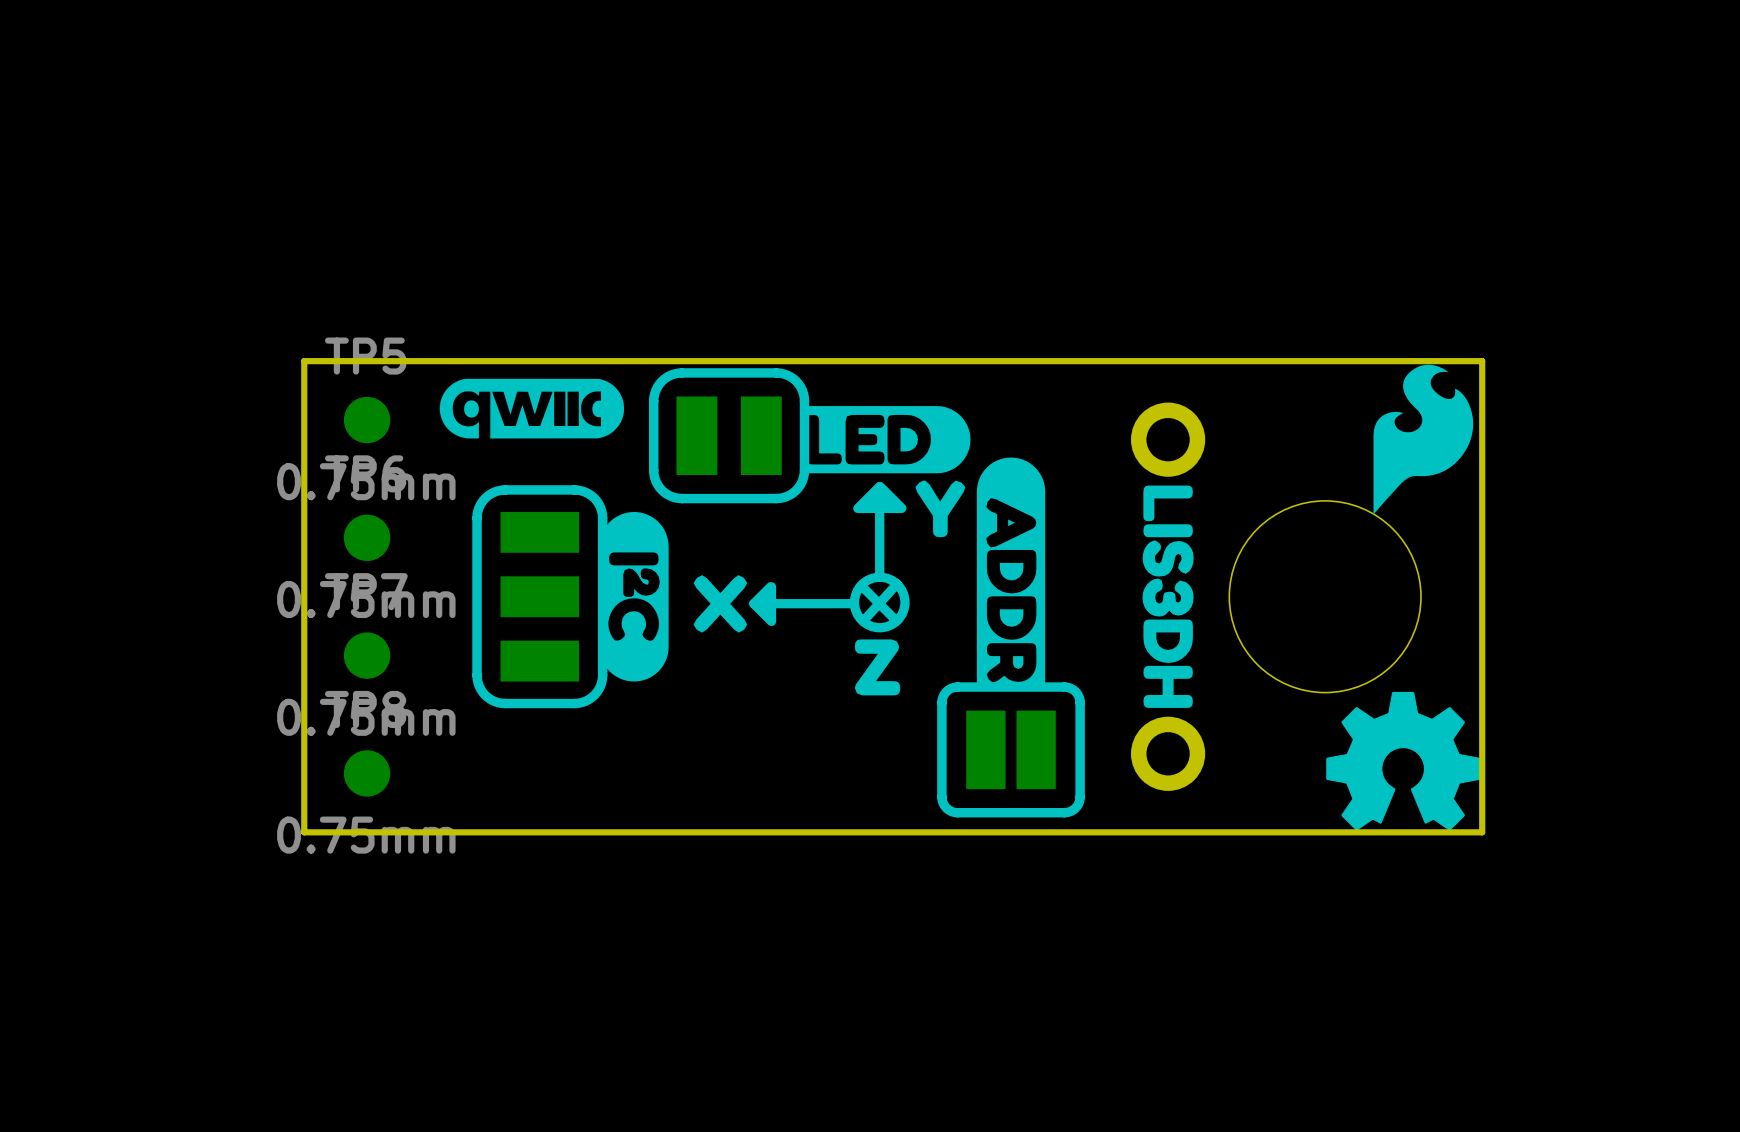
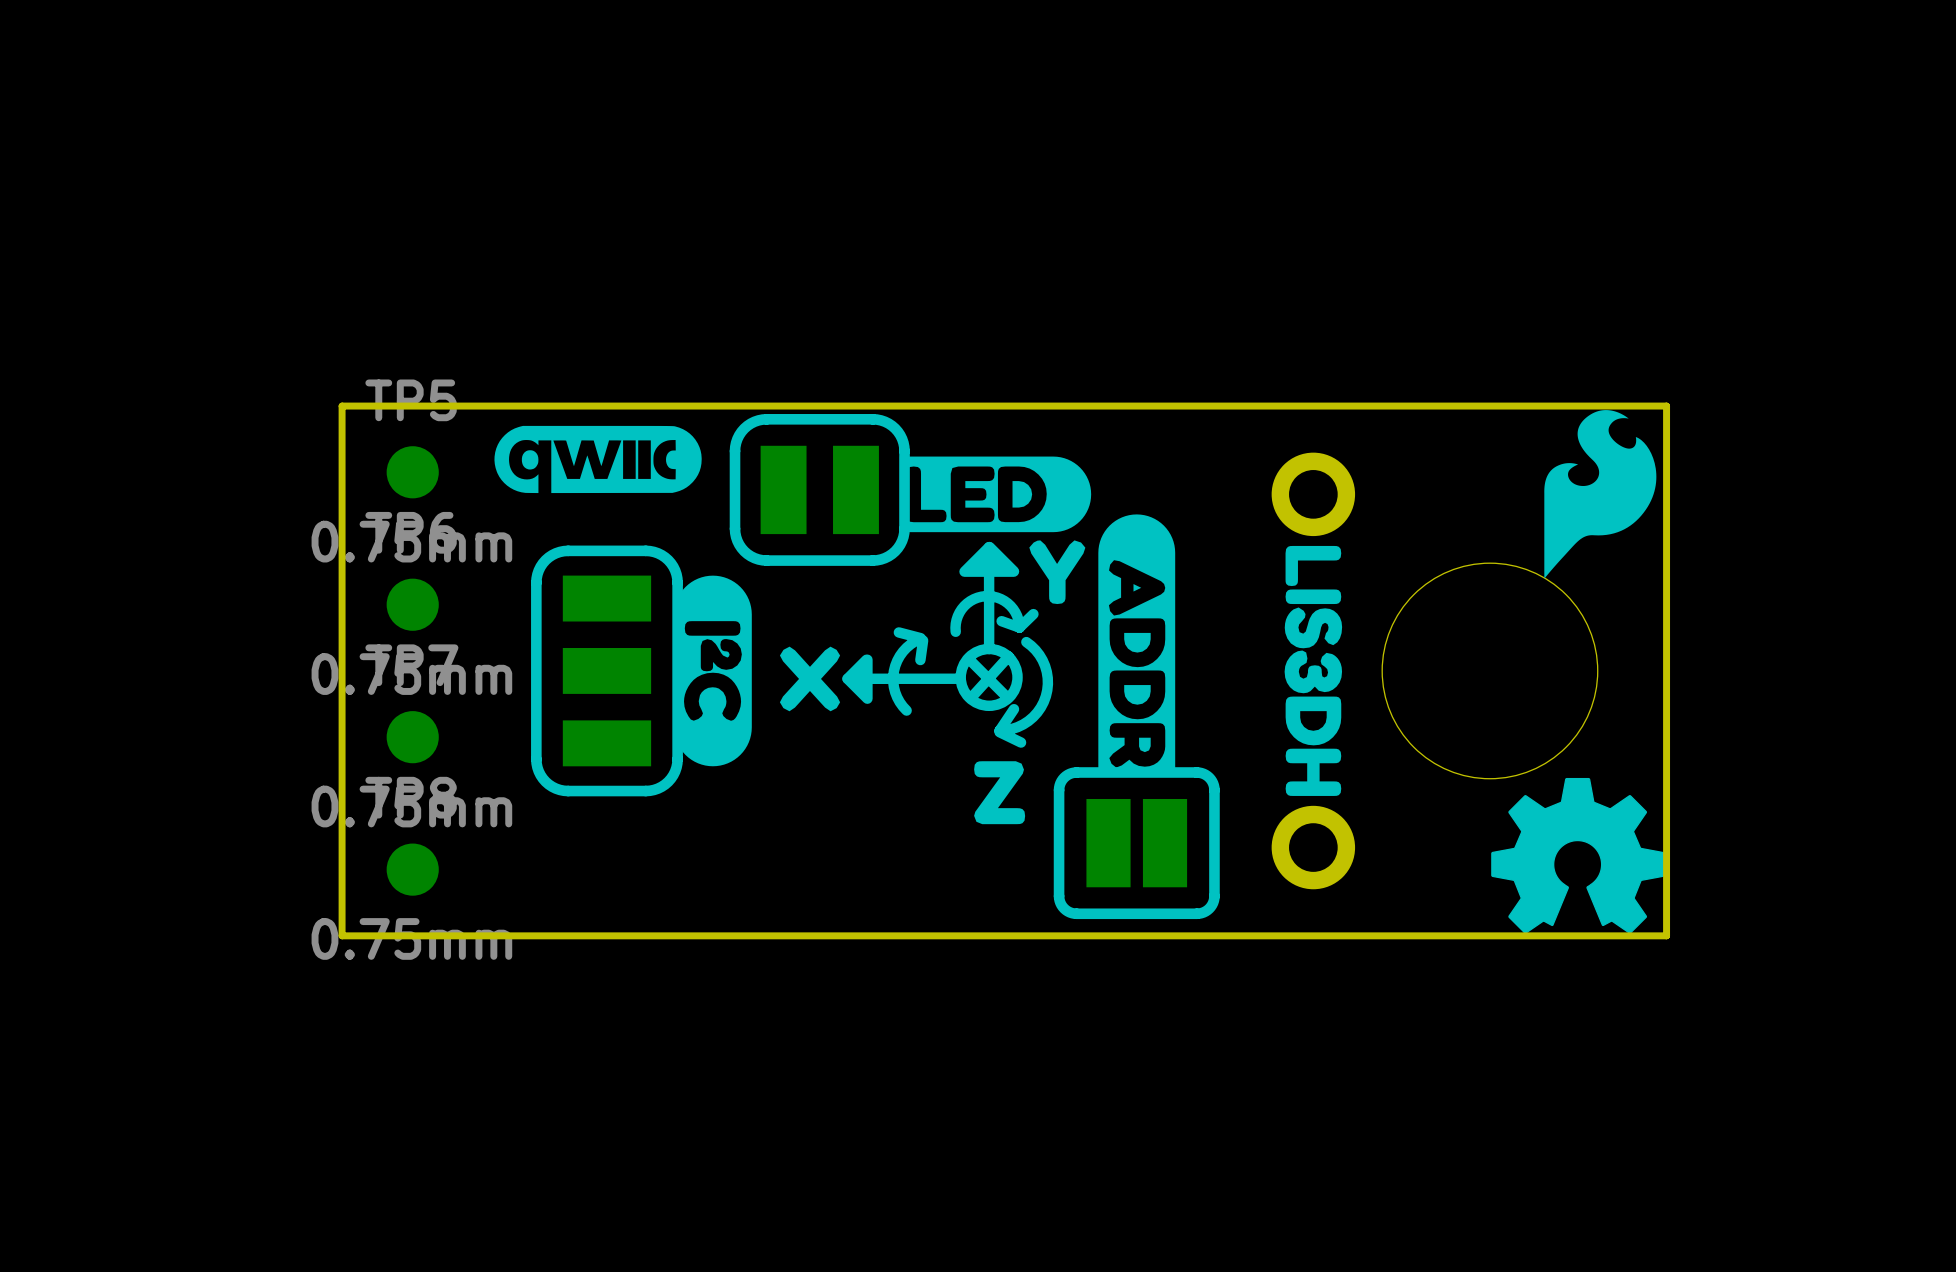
line: none -> (1033, 614) (1019, 627)
line: none -> (1001, 621) (1019, 627)
line: none -> (1019, 627) (1017, 615) (1007, 603) (997, 597) (985, 596) (970, 601) (961, 609) (956, 619) (955, 631)
line: none -> (898, 632) (920, 638)
line: none -> (920, 638) (903, 651) (893, 670) (895, 692) (906, 710)
line: none -> (923, 640) (920, 660)
line: none -> (1026, 642) (1039, 655) (1045, 665) (1047, 677) (1047, 690) (1040, 707) (1028, 721) (1011, 729) (999, 730) (1013, 709)
line: none -> (999, 732) (1021, 742)
drawing position: (877, 667) -> (999, 792)

